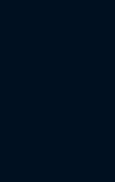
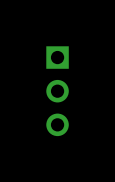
part: none -> (57, 91)

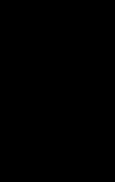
part: (57, 91) -> none

